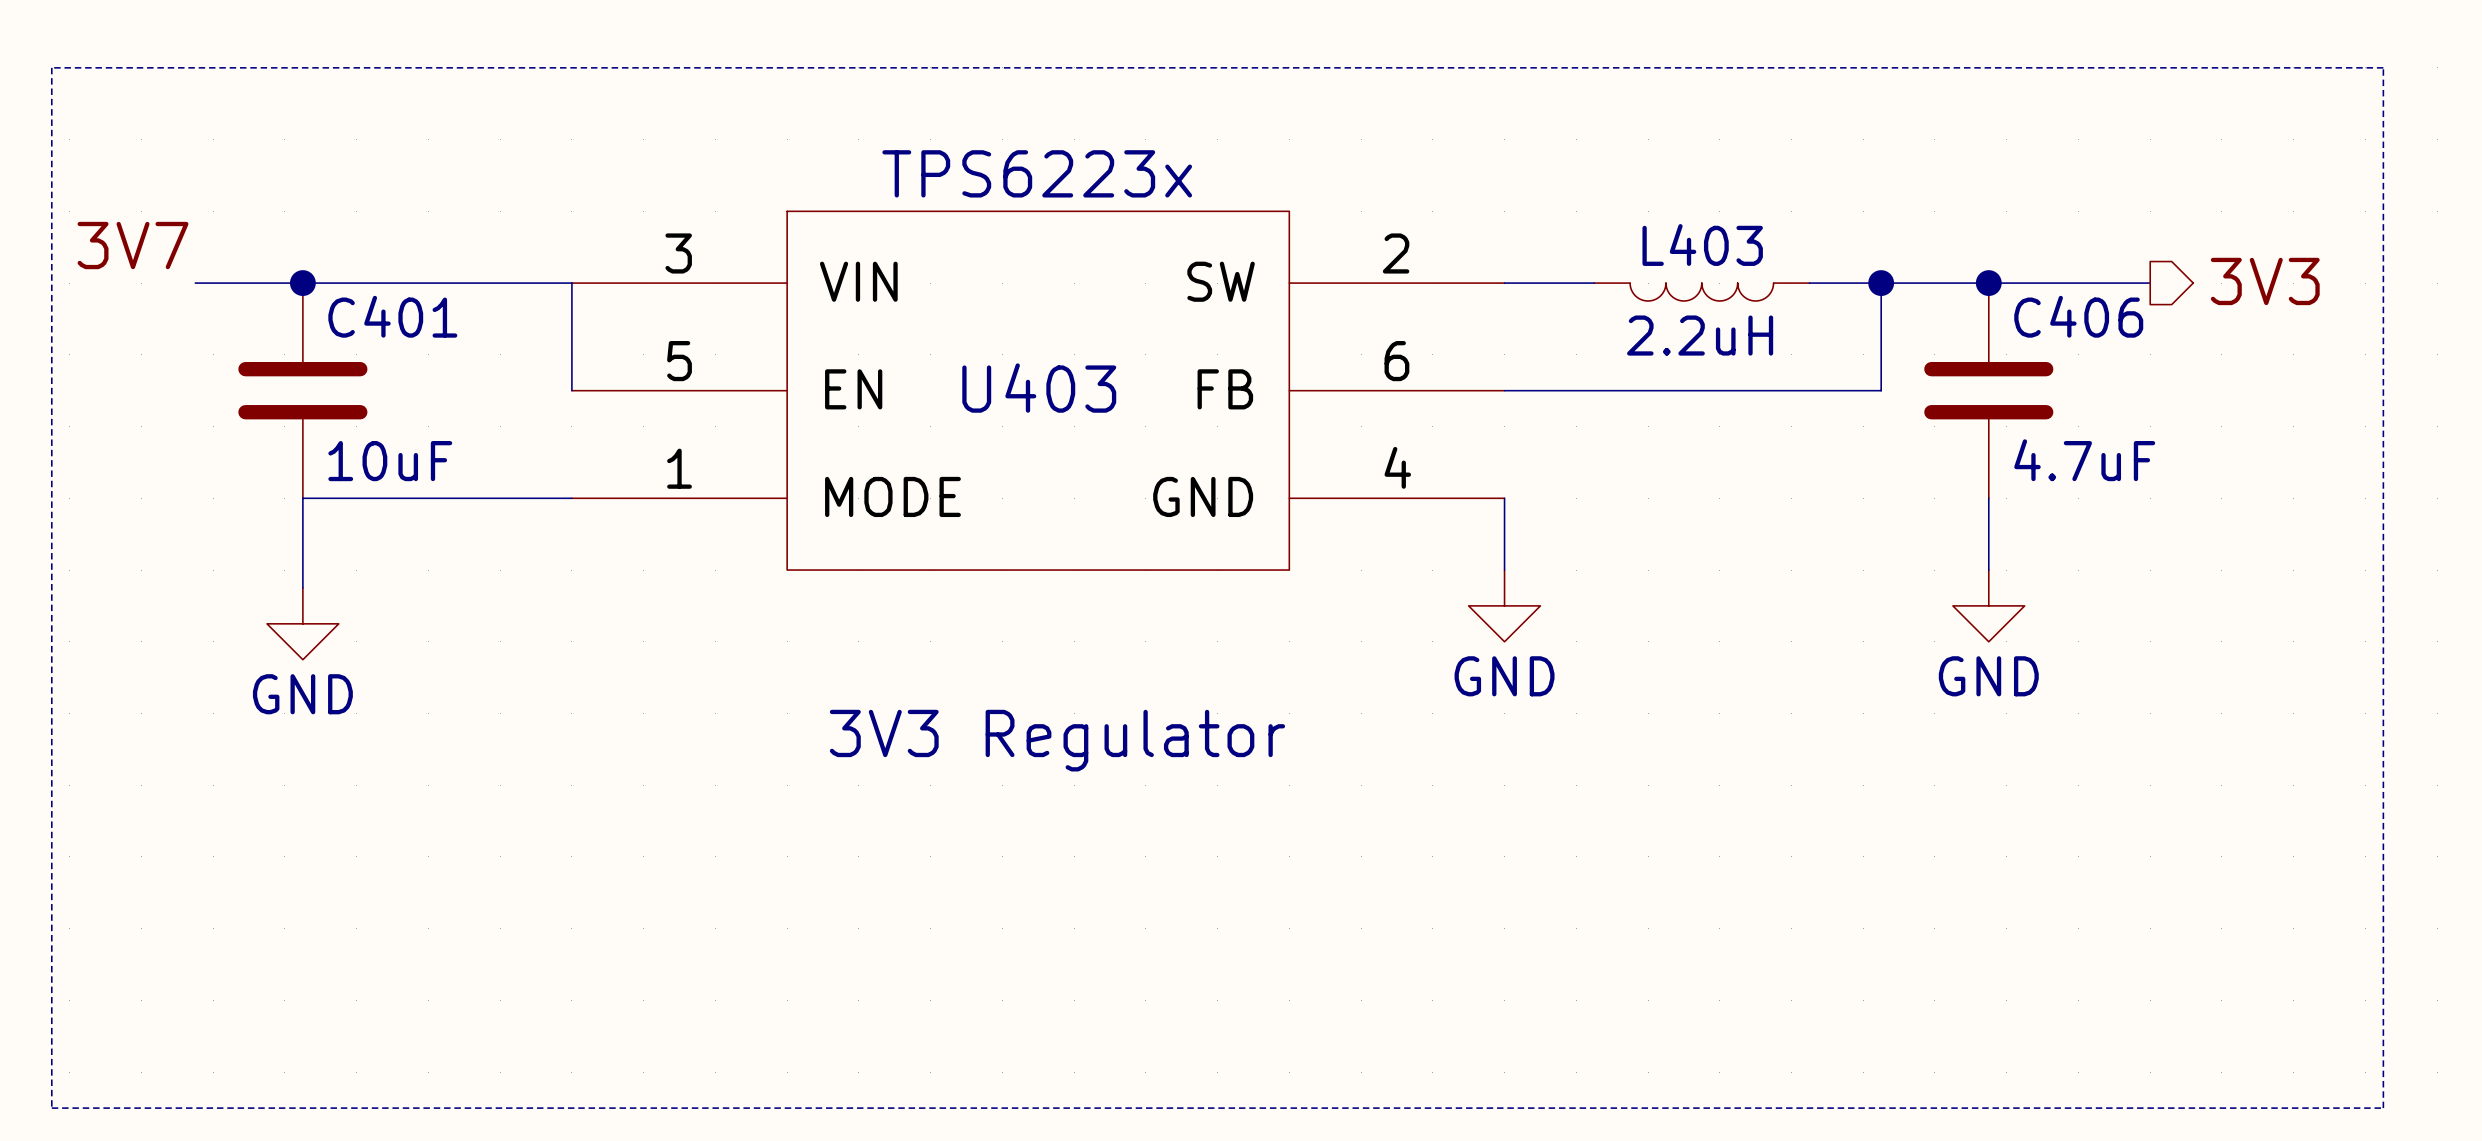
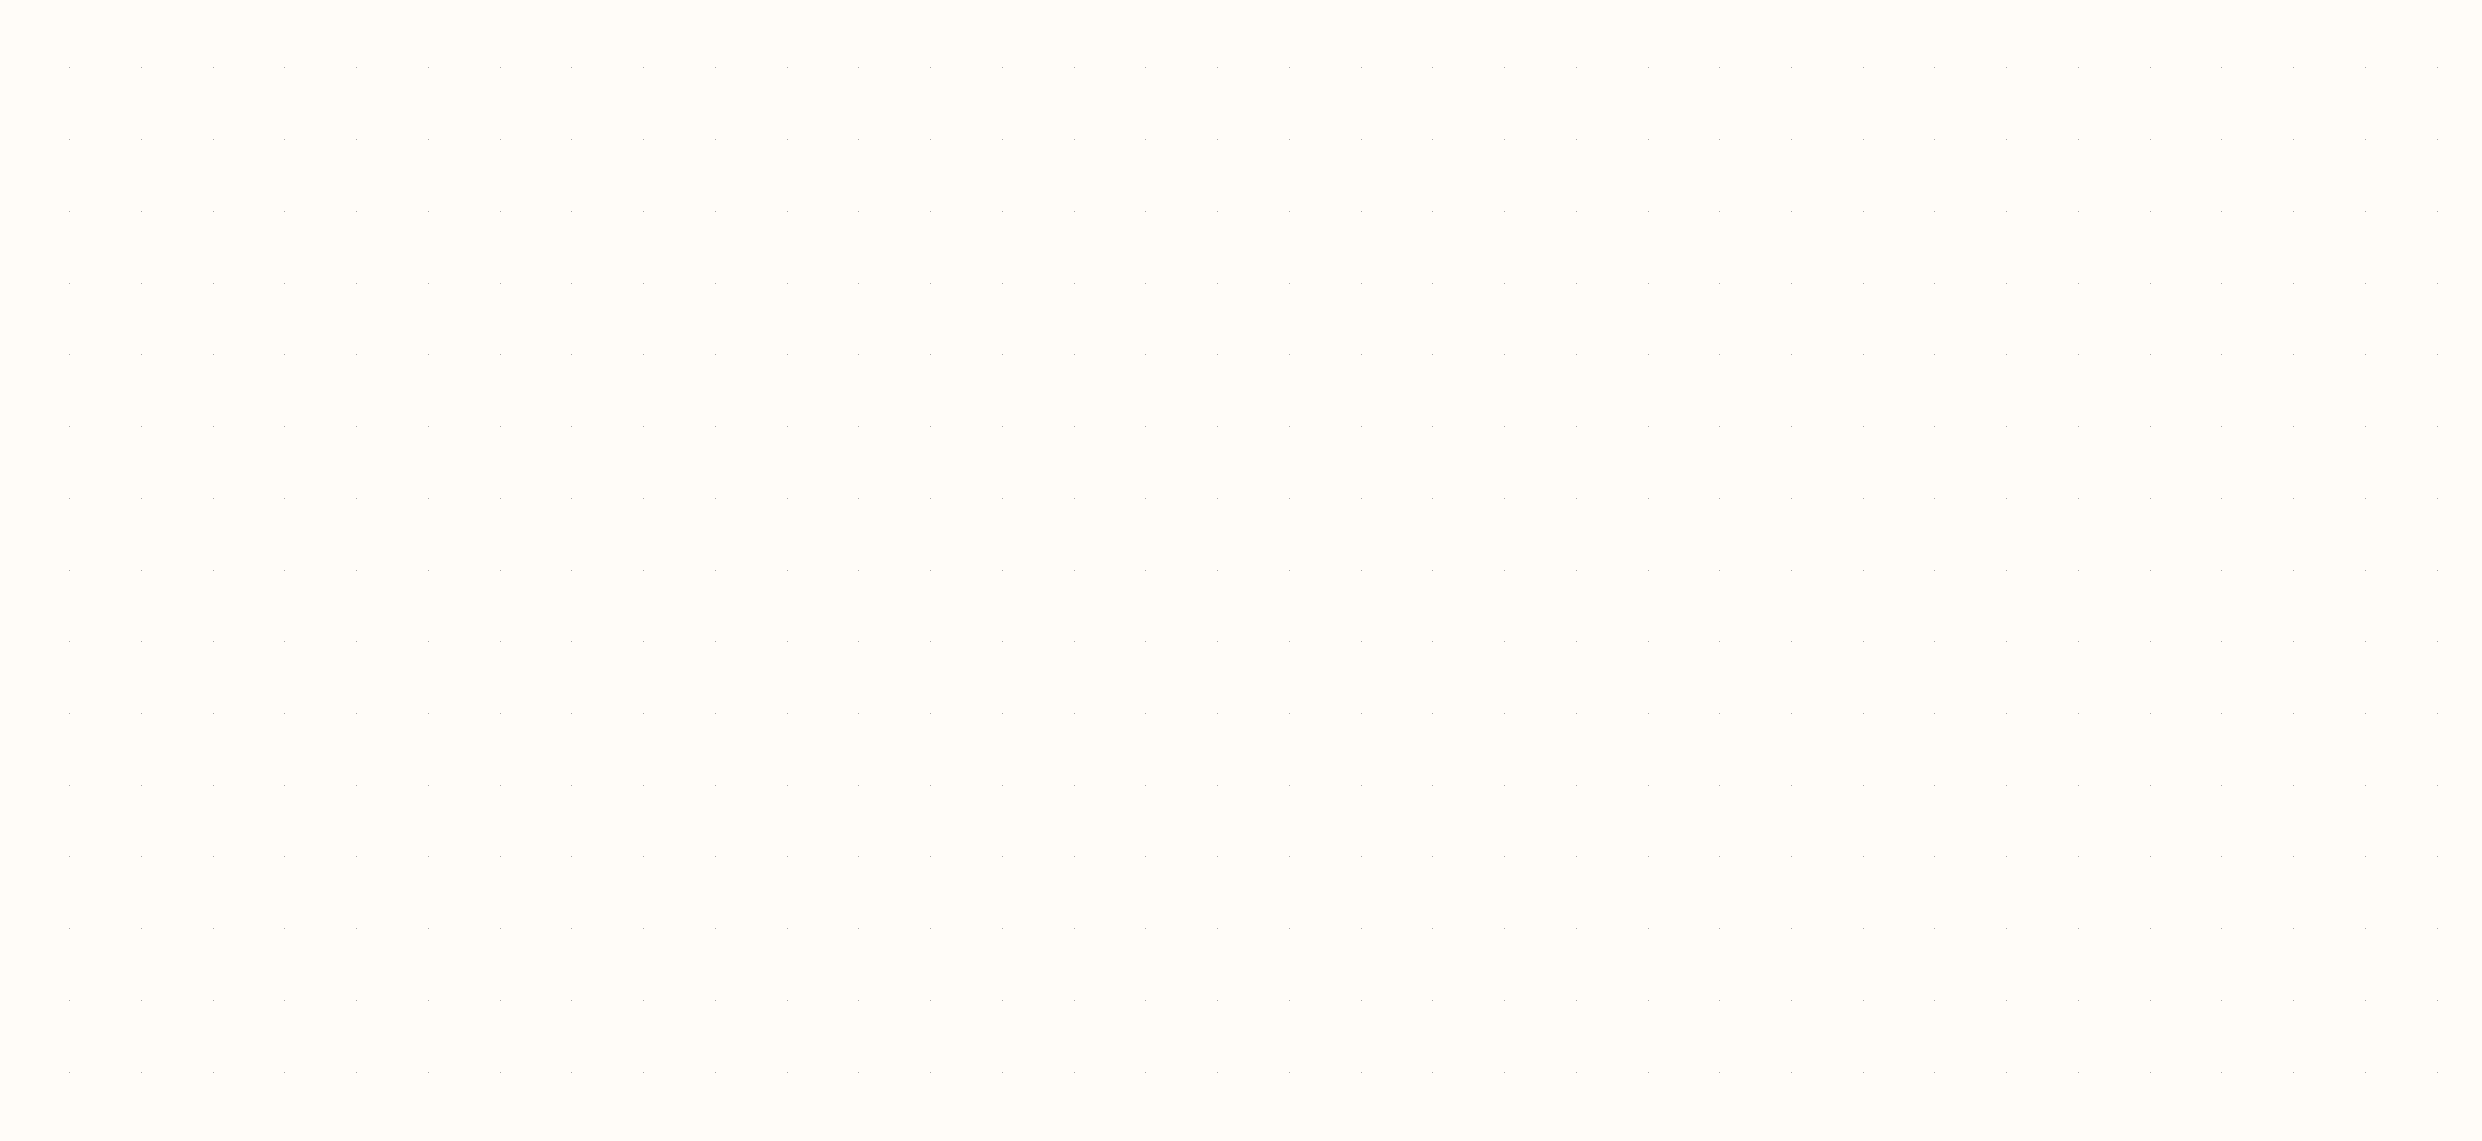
line: (51, 67) (2383, 67) (2383, 1108) (51, 1108) (51, 67) -> none
label: 3V7 (133, 245) -> none
hierarchical label: 3V3 (2265, 281) -> none
wire: (195, 283) (571, 283) (571, 390) -> none
junction: (302, 283) -> none
wire: (1504, 283) (1594, 283) -> none
wire: (1809, 283) (2150, 283) -> none
wire: (1881, 283) (1881, 390) (1504, 390) -> none
junction: (1881, 283) -> none
junction: (1988, 283) -> none
L403: 2.2uH (1701, 292) -> none
C401: 10uF (302, 390) -> none
U403: TPS6223x (1038, 390) -> none
C406: 4.7uF (1988, 390) -> none
wire: (571, 498) (302, 498) (302, 587) -> none
wire: (1504, 498) (1504, 570) -> none
wire: (1988, 498) (1988, 570) -> none
power symbol: GND (1504, 605) -> none
power symbol: GND (1988, 605) -> none
power symbol: GND (302, 623) -> none
text: 3V3 Regulator (1057, 740) -> none

